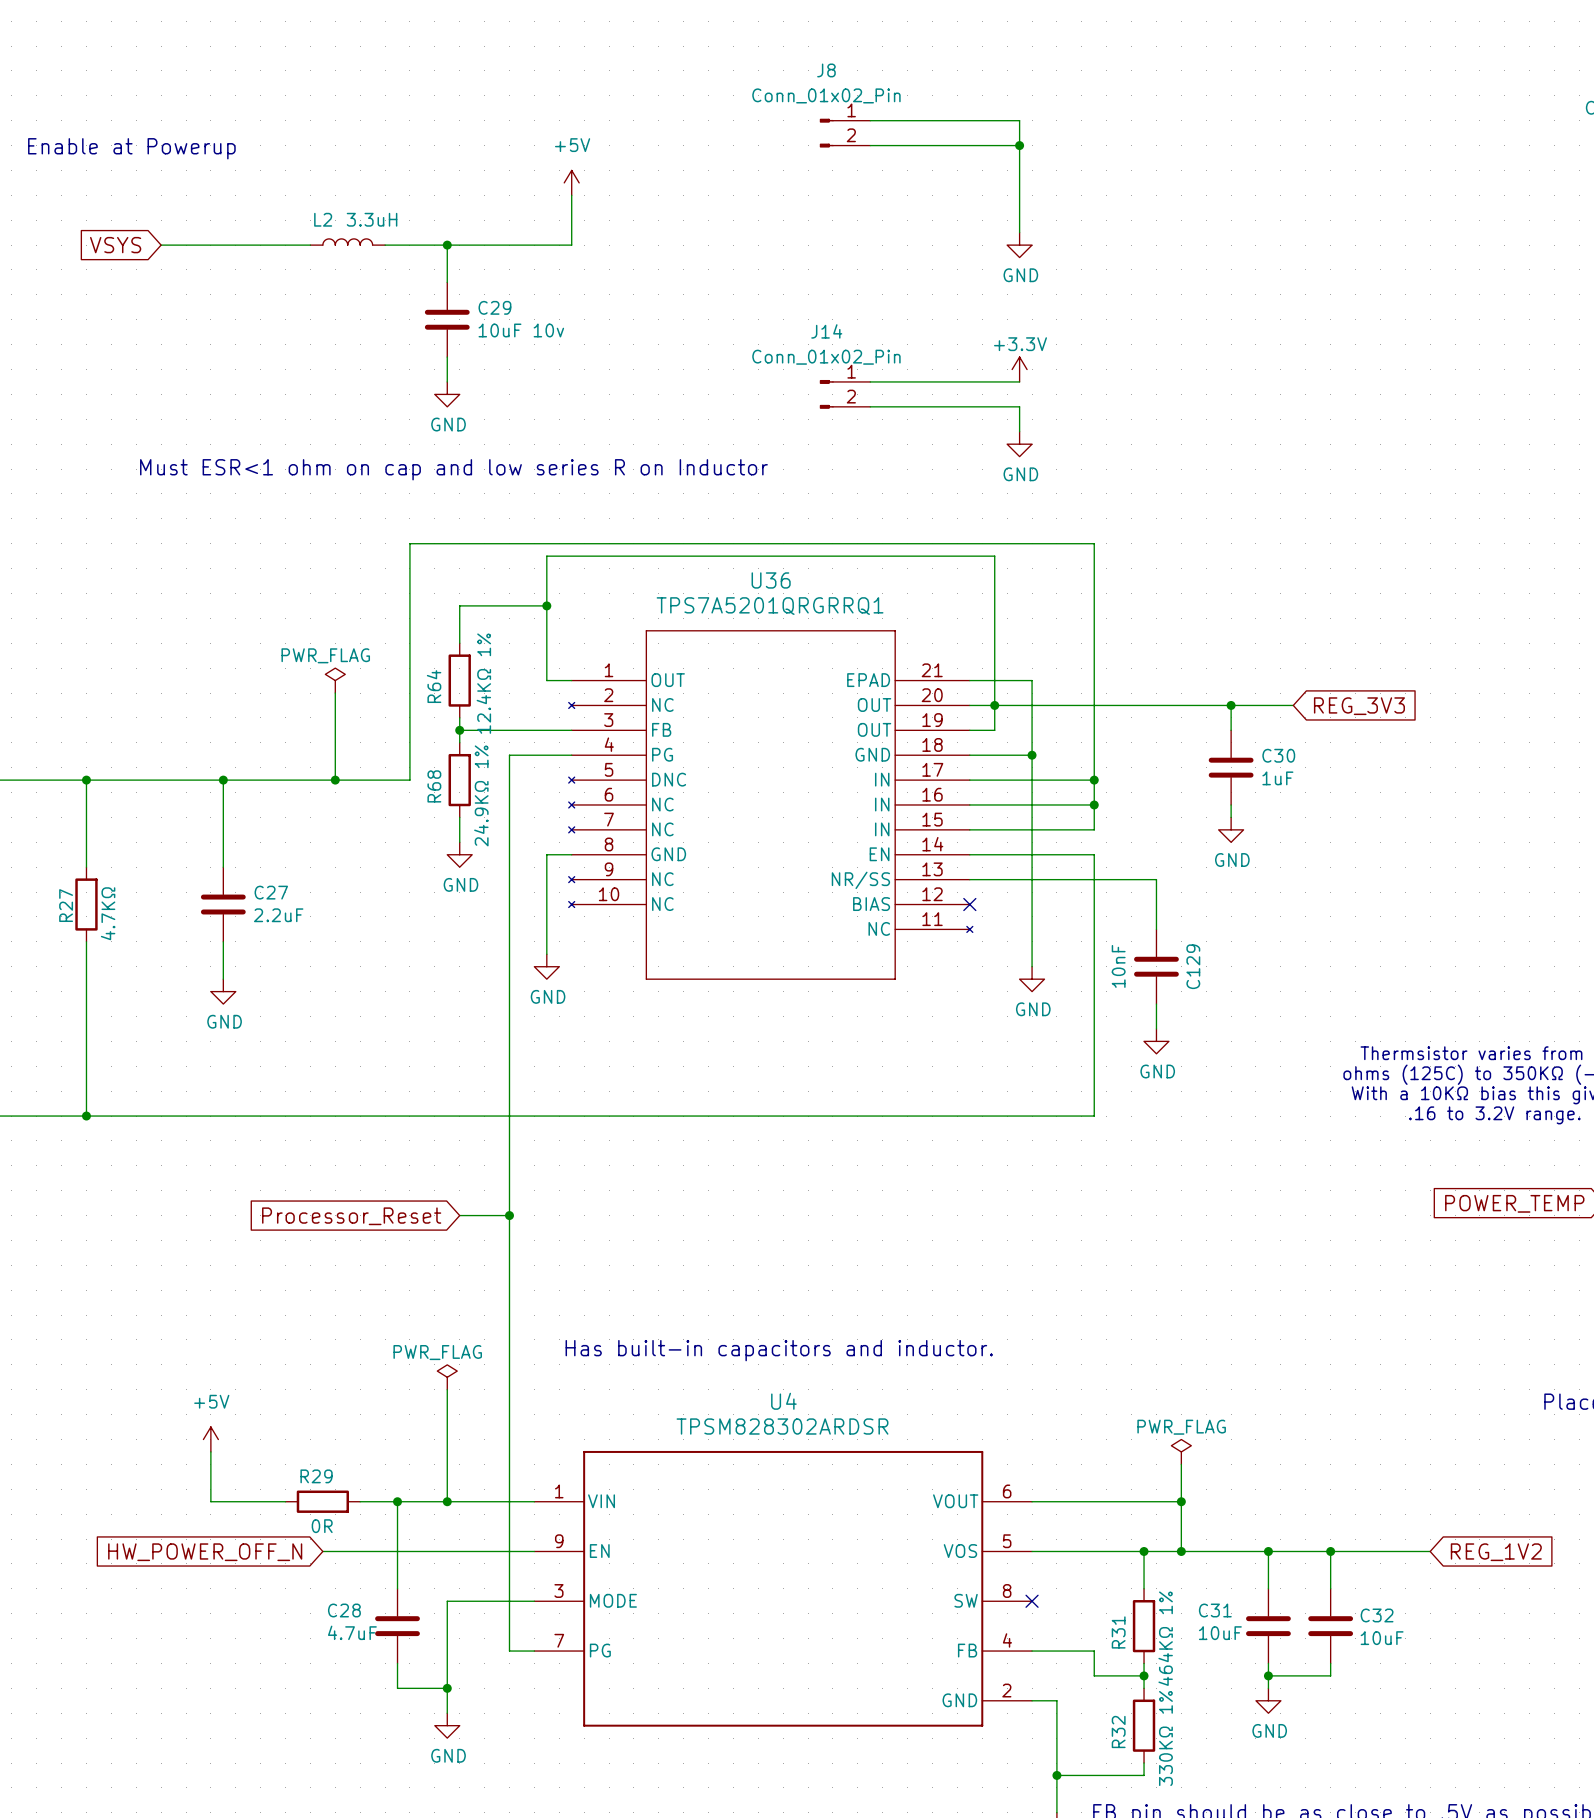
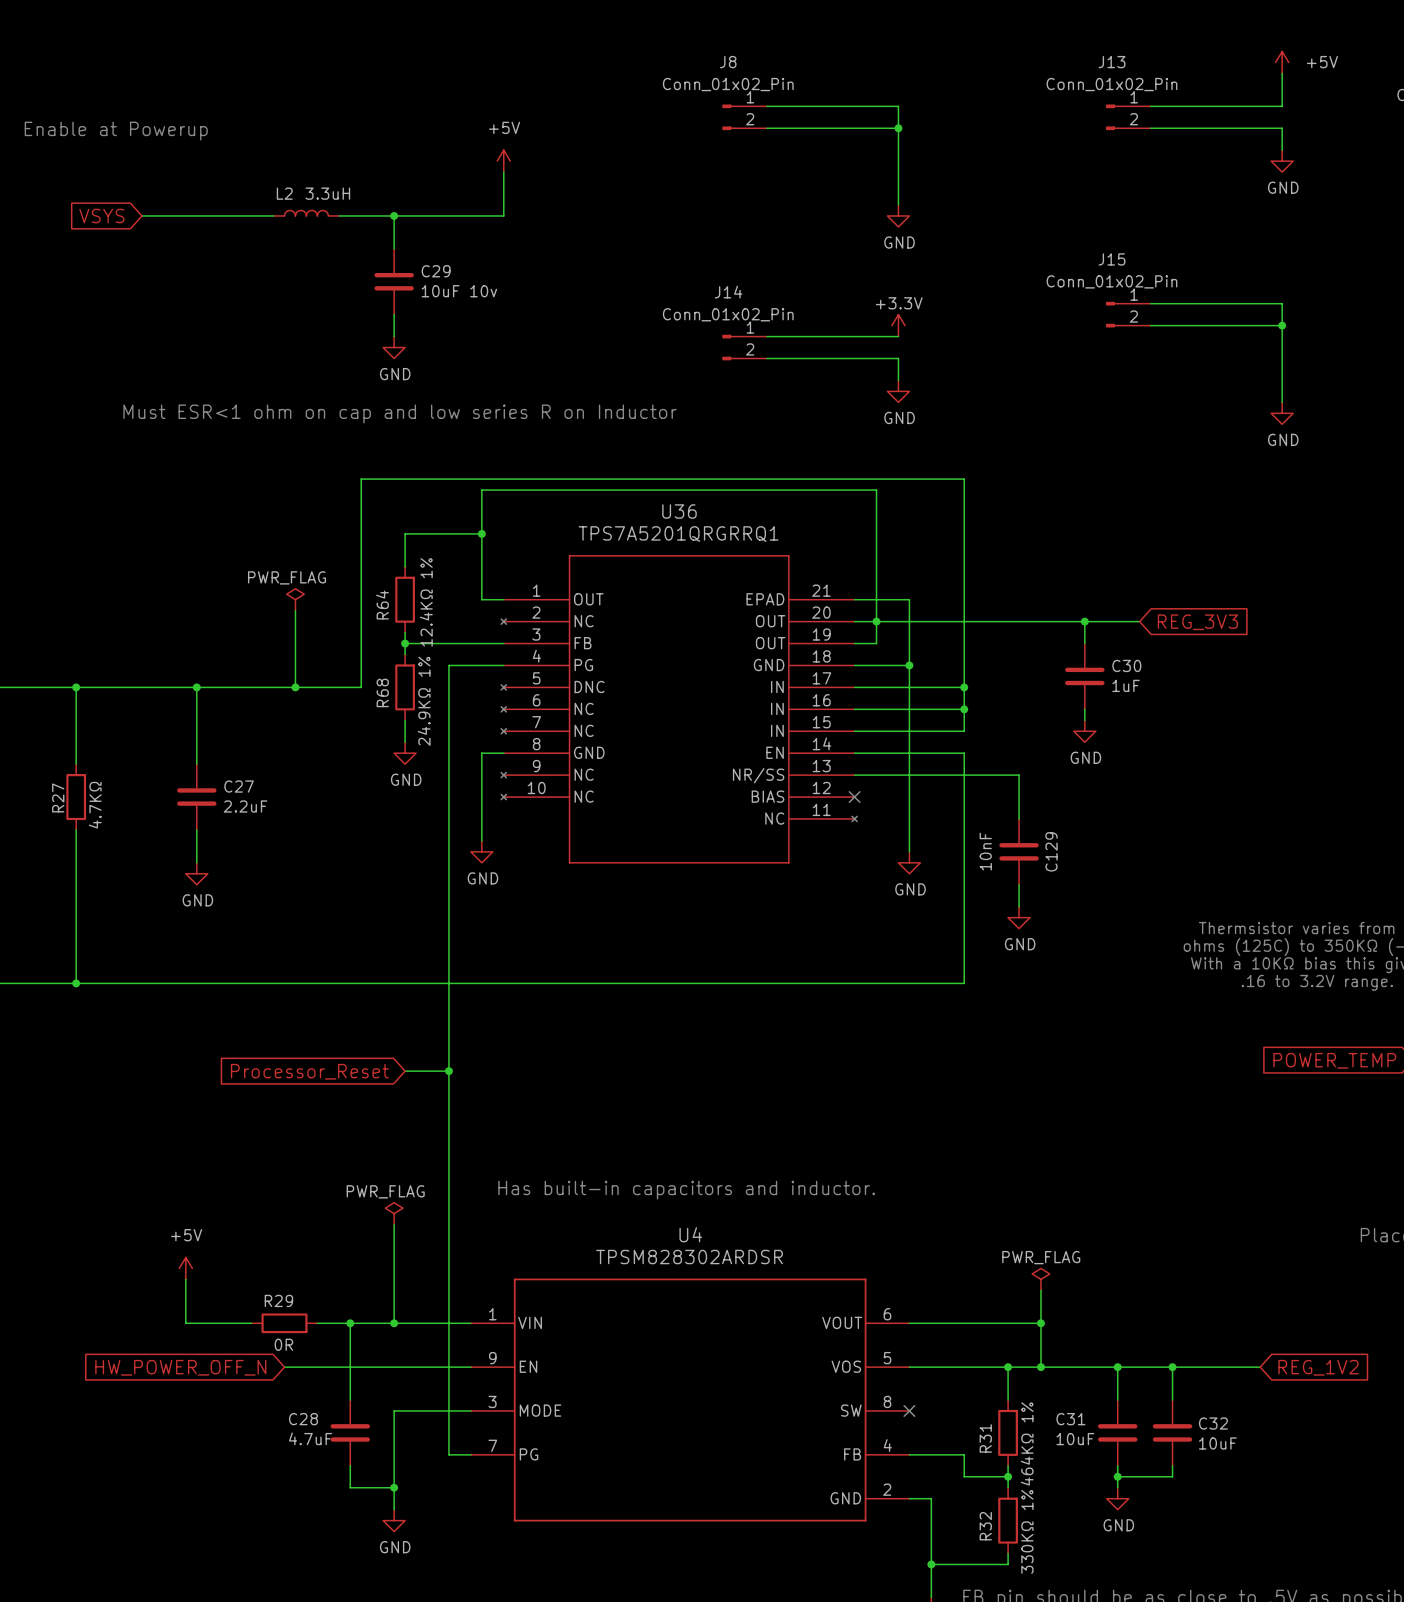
power symbol: none -> +5V (1282, 62)
wire: none -> (1282, 73) (1282, 106) (1150, 106)
J13: none -> Conn_01x02_Pin (1128, 117)
wire: none -> (1150, 128) (1282, 128) (1282, 150)
power symbol: none -> GND (1282, 161)
wire: none -> (1150, 303) (1282, 303) (1282, 402)
J15: none -> Conn_01x02_Pin (1128, 314)
wire: none -> (1150, 325) (1282, 325)
junction: none -> (1282, 325)
power symbol: none -> GND (1282, 413)

